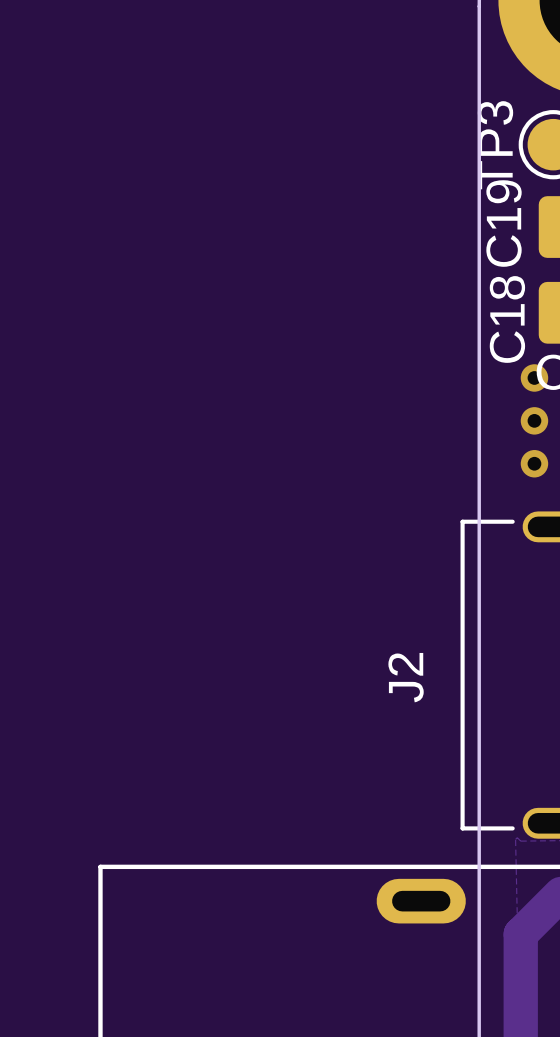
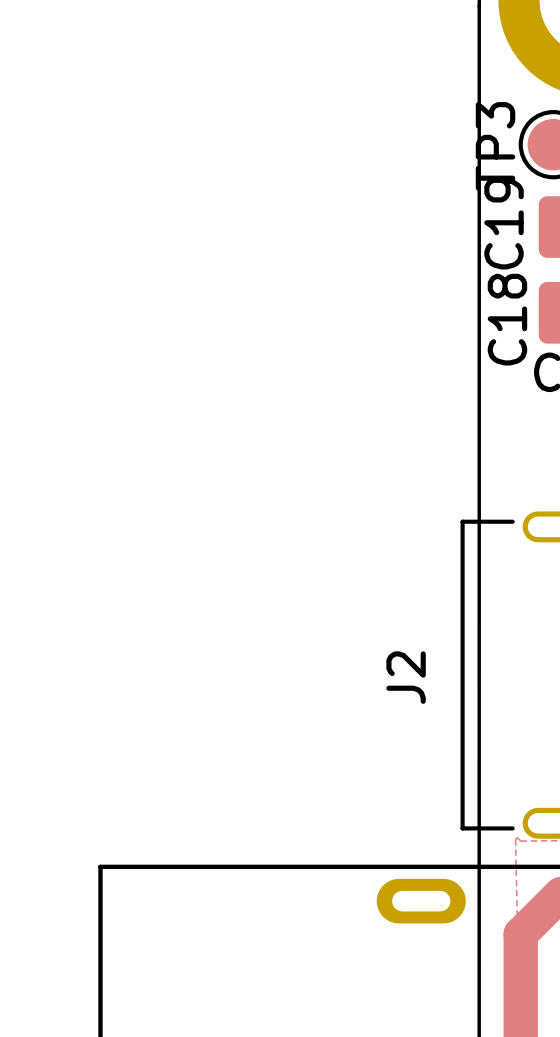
via: (534, 377) -> none
via: (534, 420) -> none
via: (534, 463) -> none

